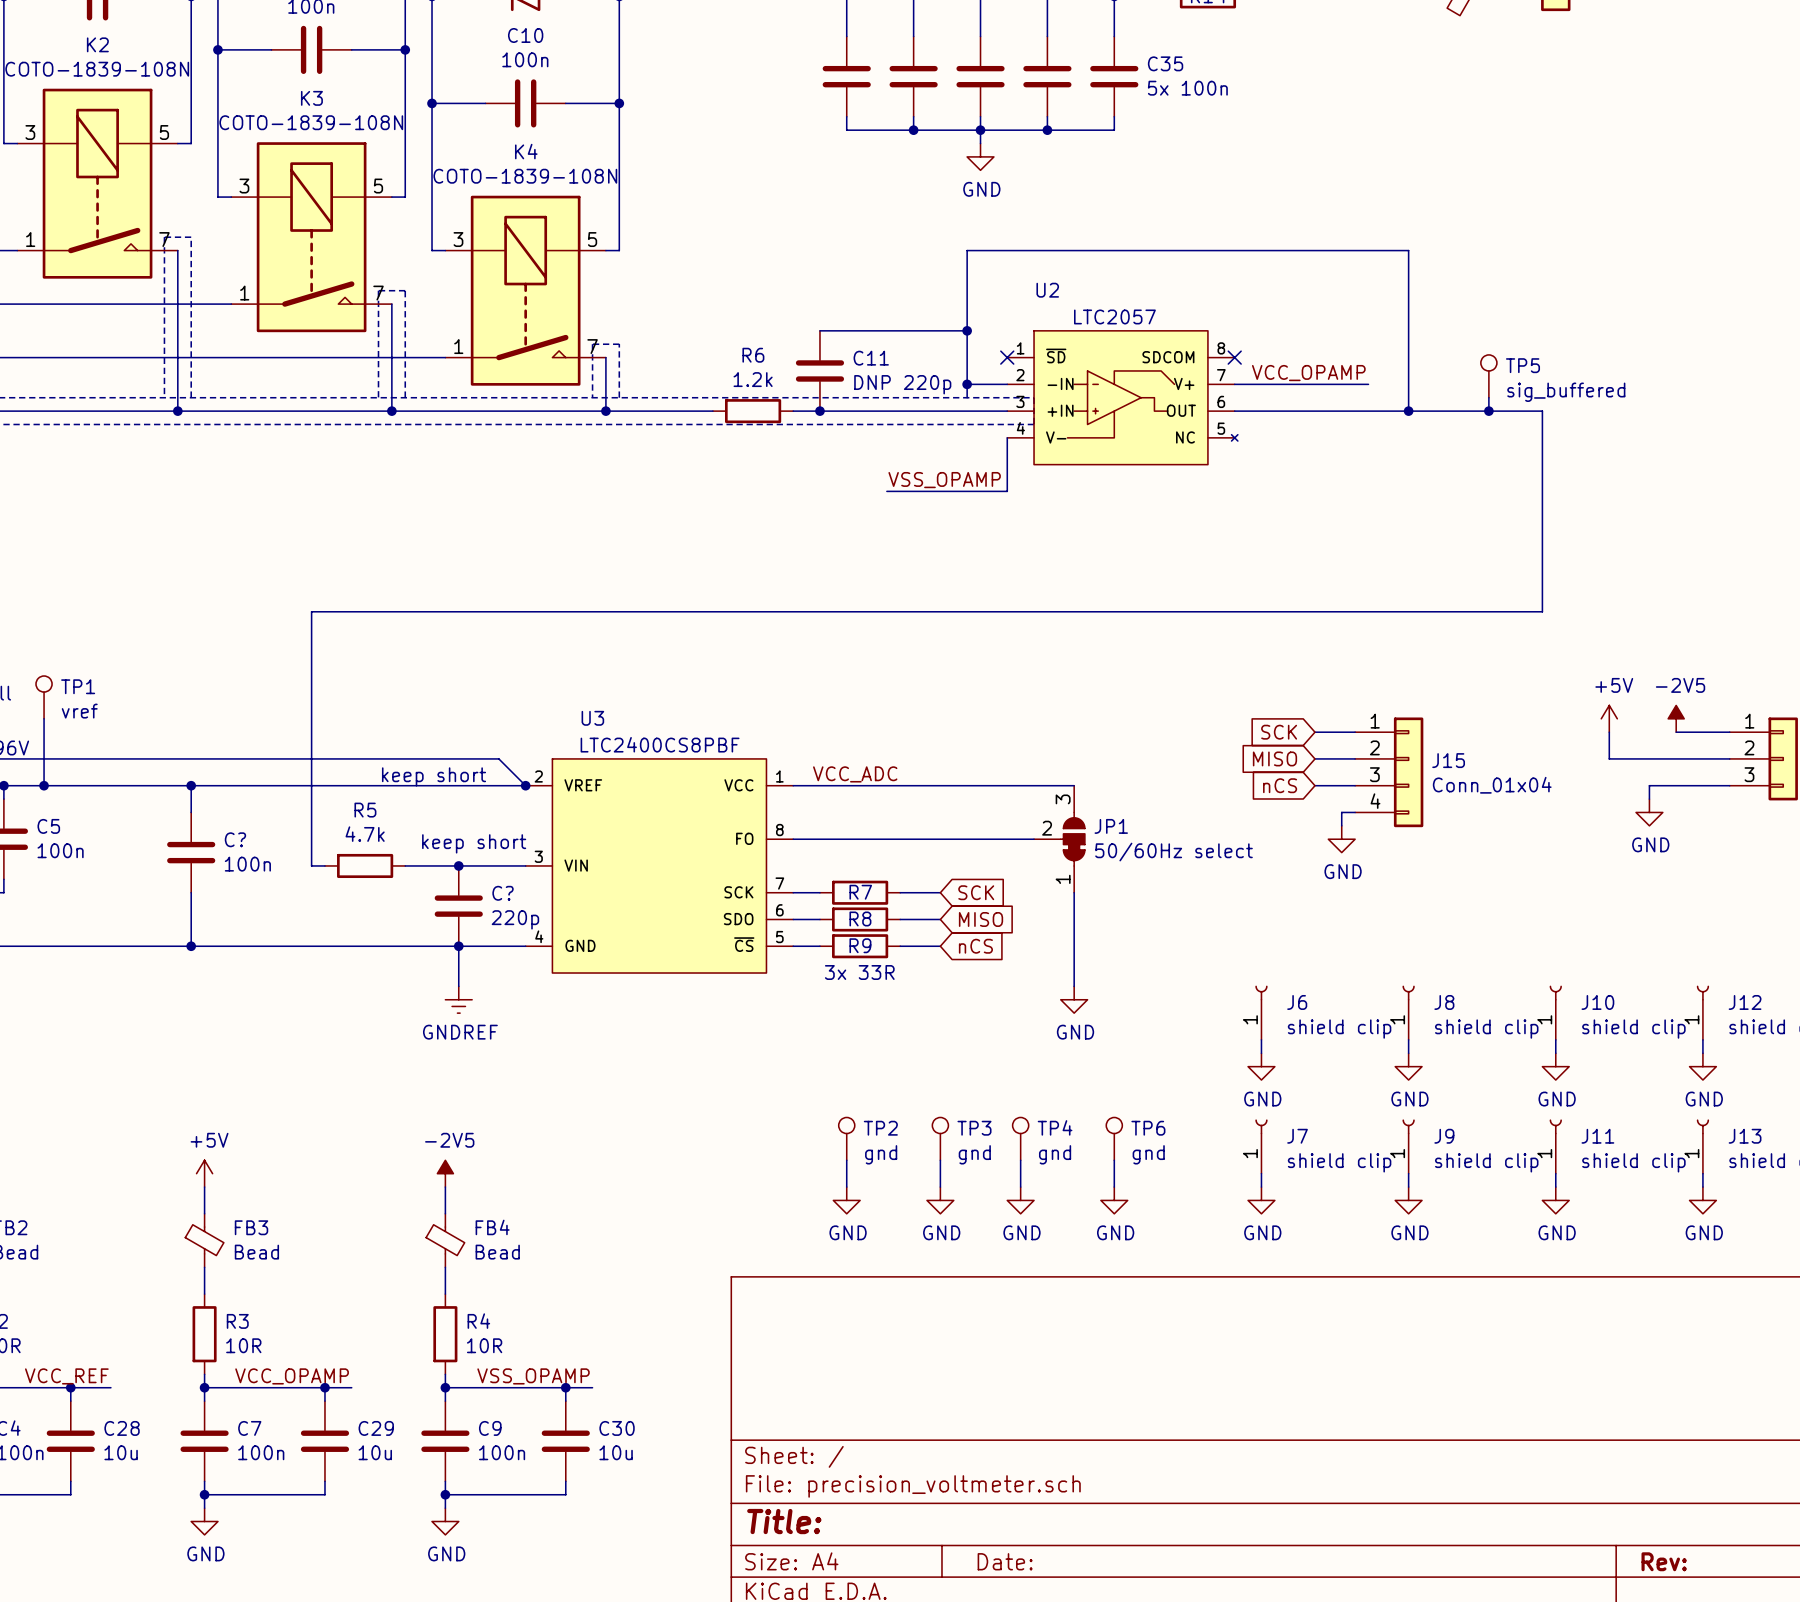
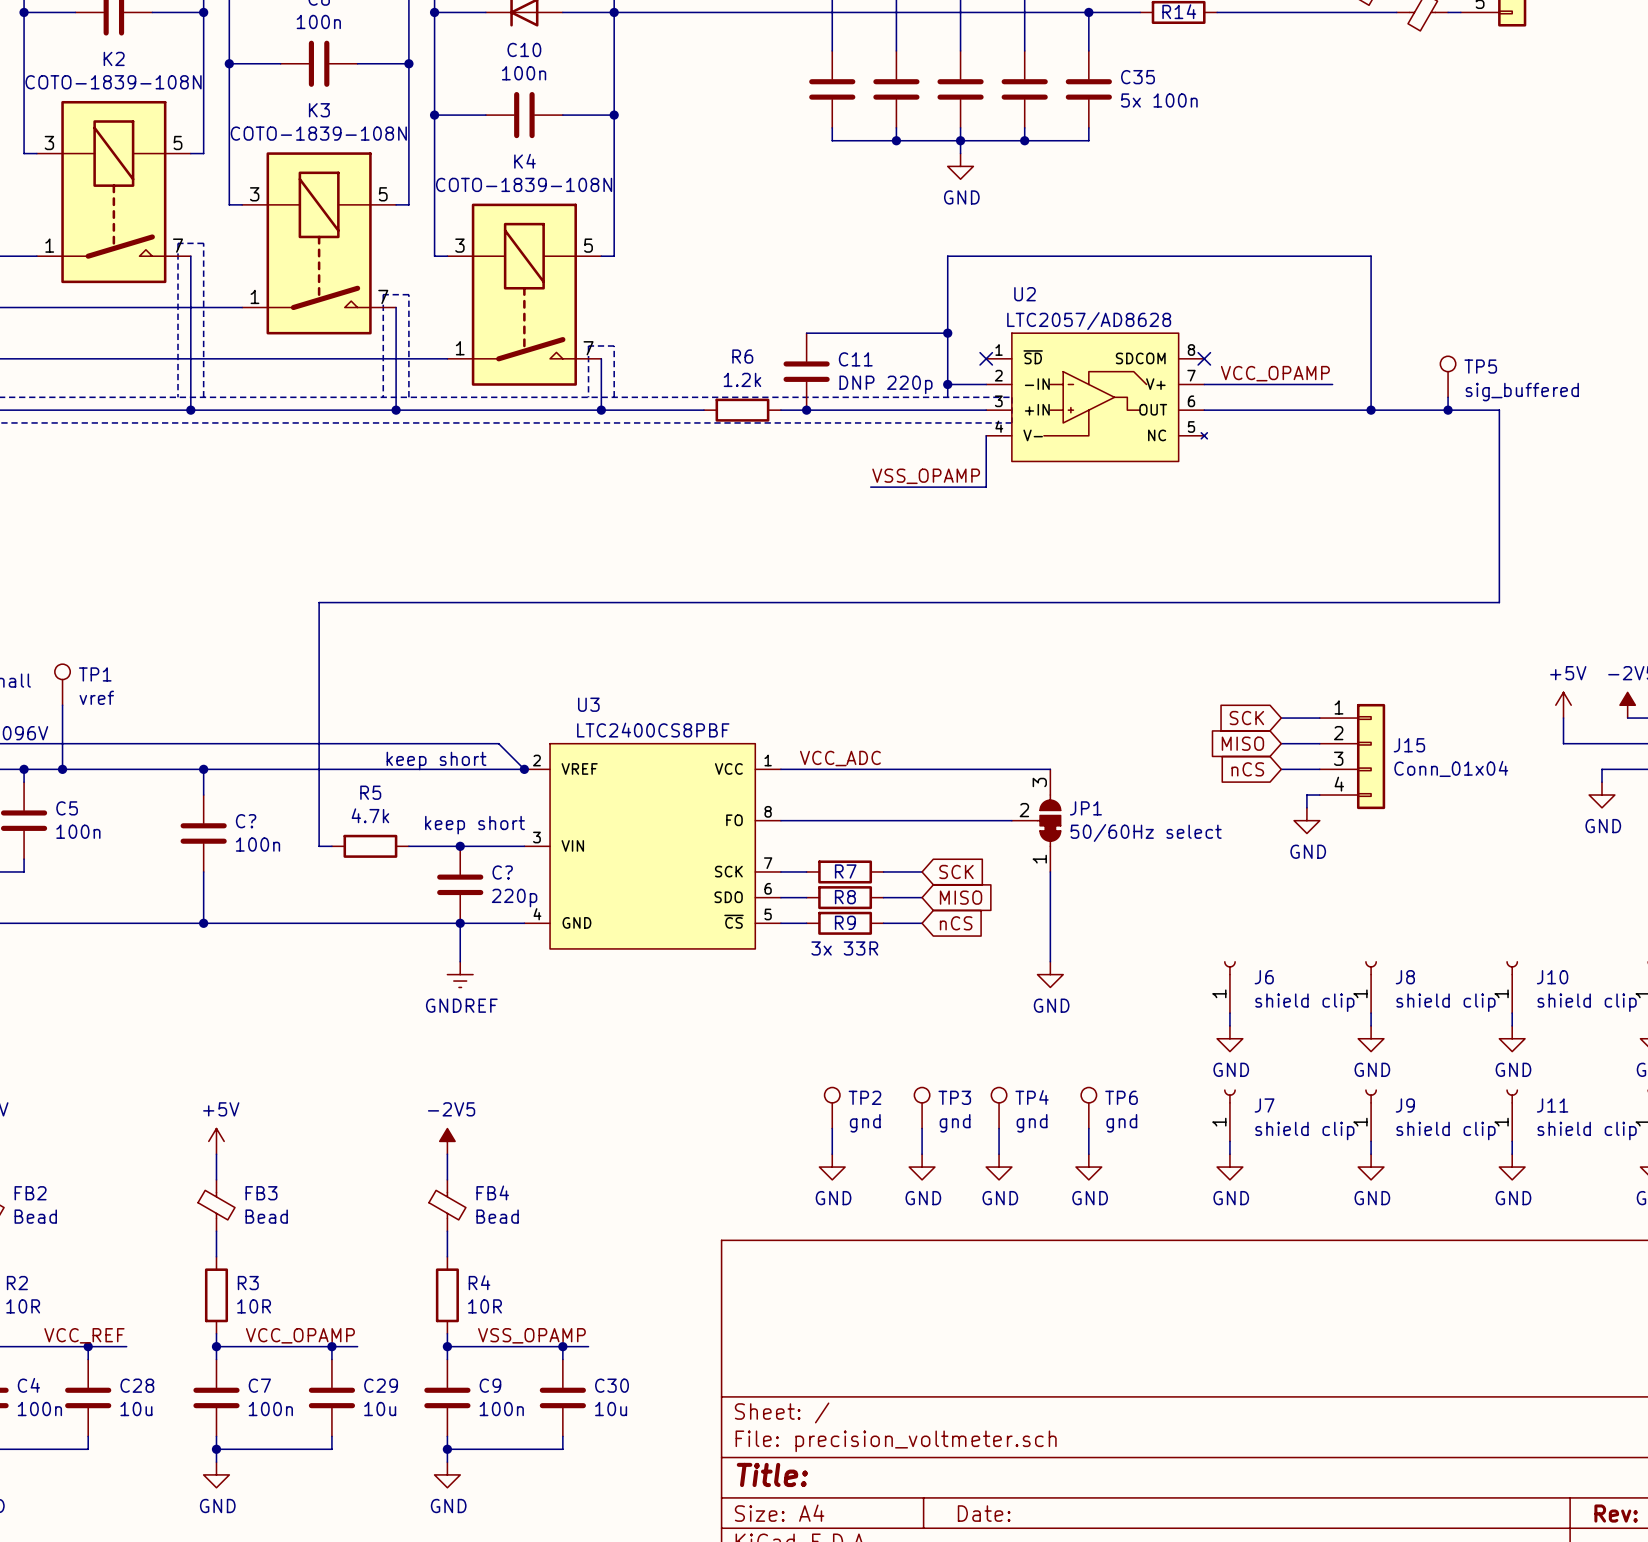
U2 value: LTC2057 (1114, 316) -> LTC2057/AD8628 (1089, 321)

